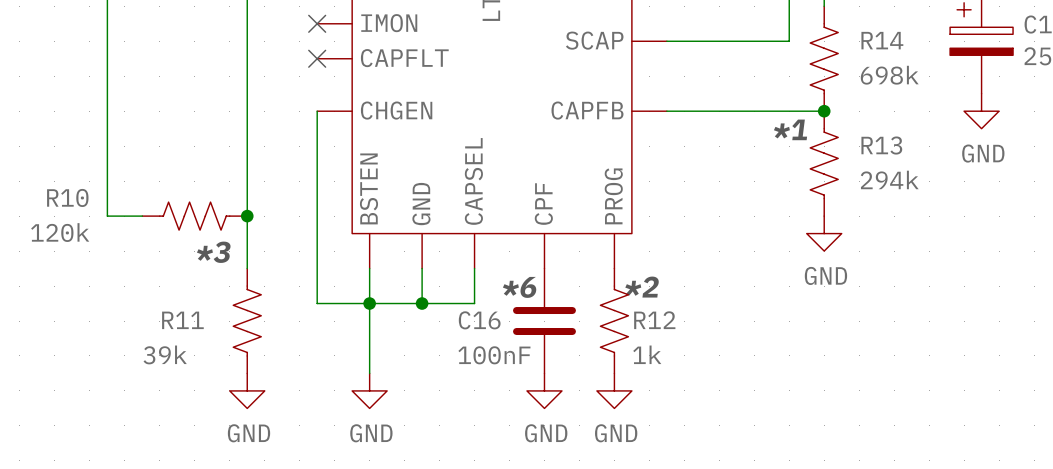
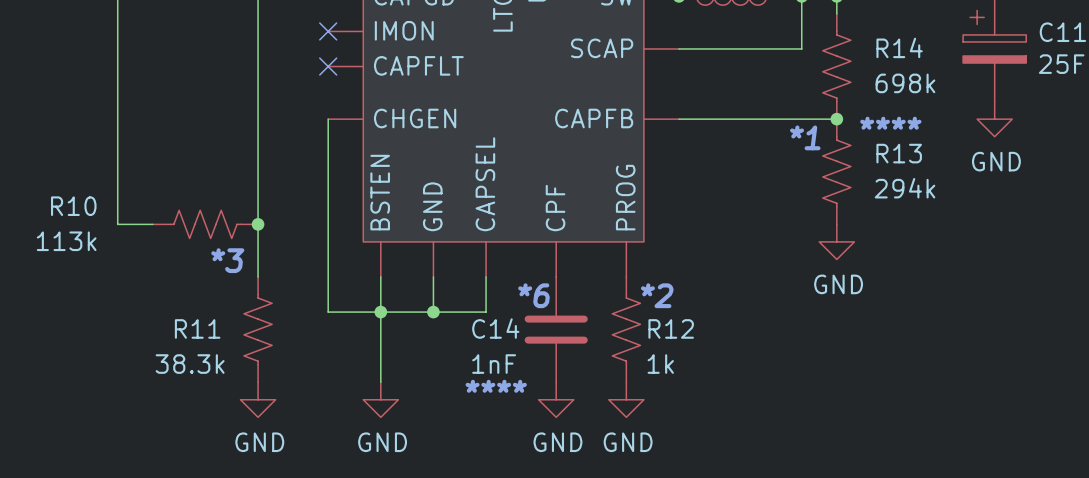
text: none -> **** (890, 123)
R10 value: 120k (60, 232) -> 113k (66, 241)
C16 name: C16 (479, 320) -> C14 (495, 328)
R11 value: 39k (165, 354) -> 38.3k (190, 364)
C16 value: 100nF (494, 355) -> 1nF (494, 364)
text: none -> **** (496, 386)

